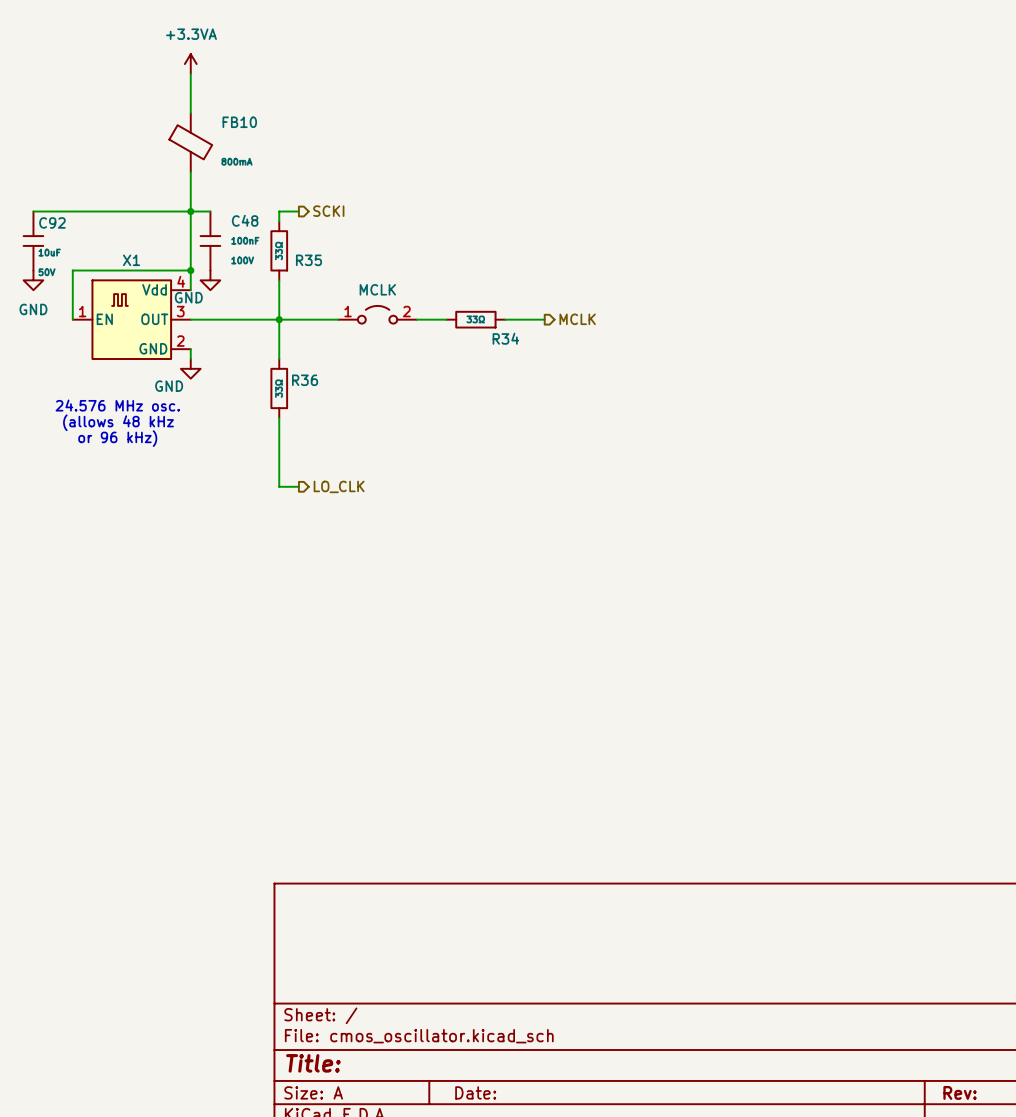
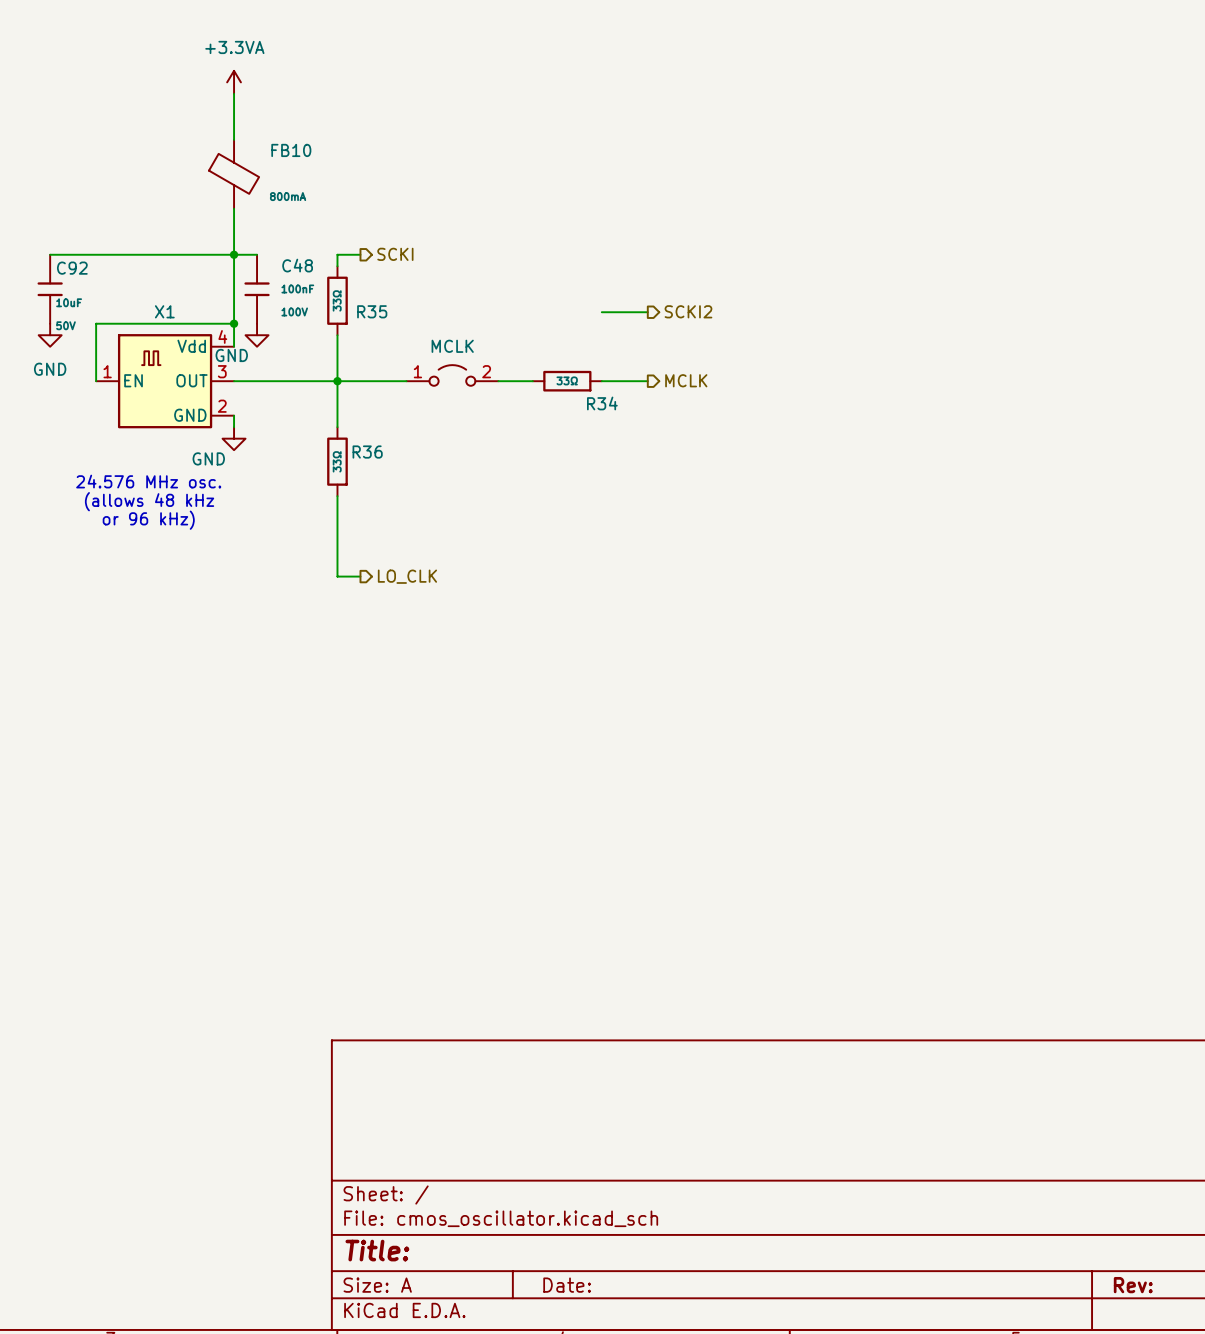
wire: none -> (601, 312) (647, 312)
hierarchical label: none -> SCKI2 (688, 311)

